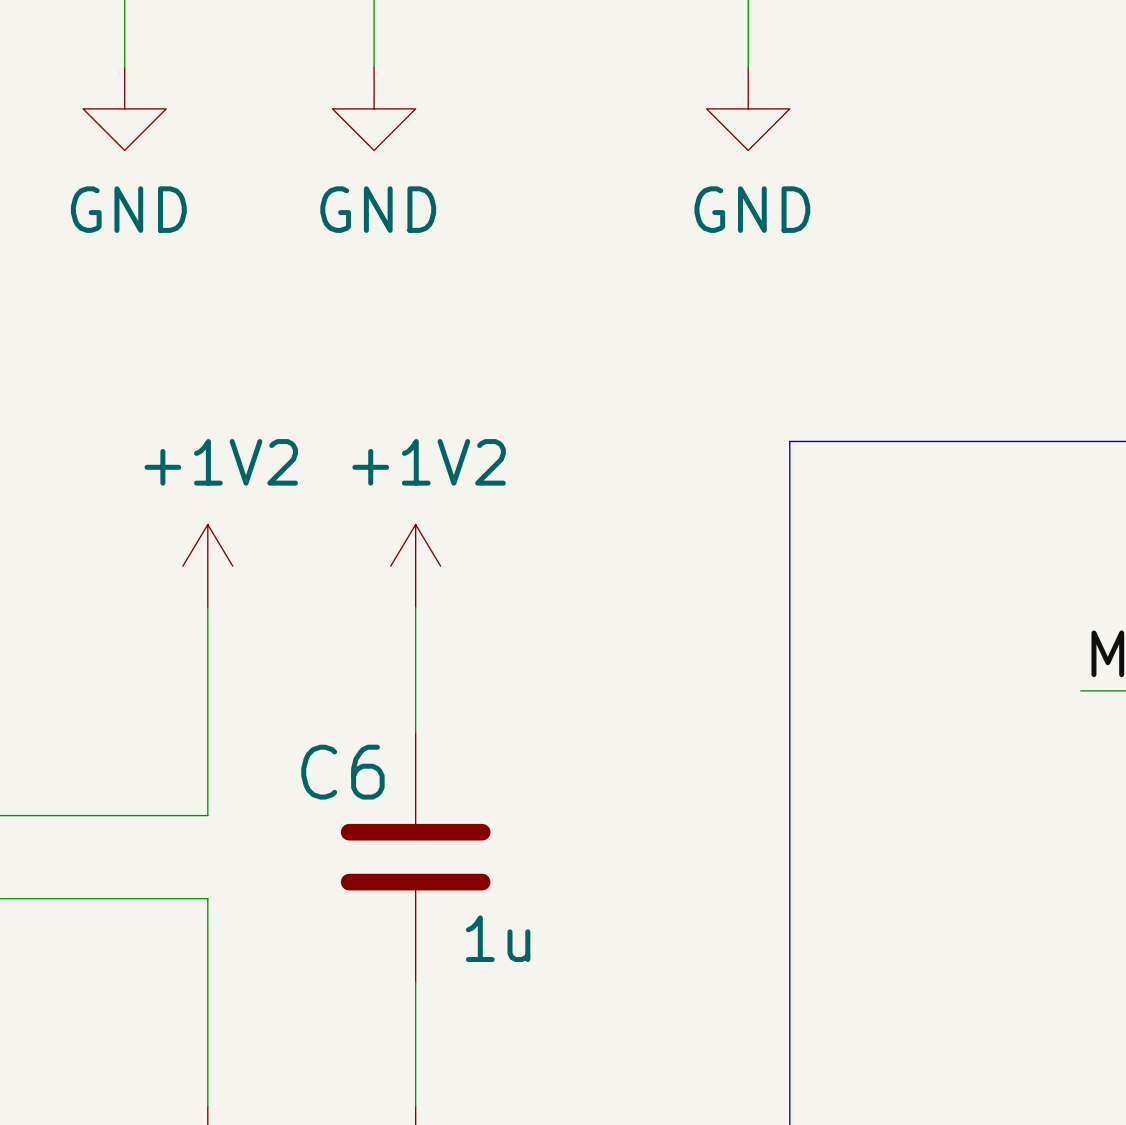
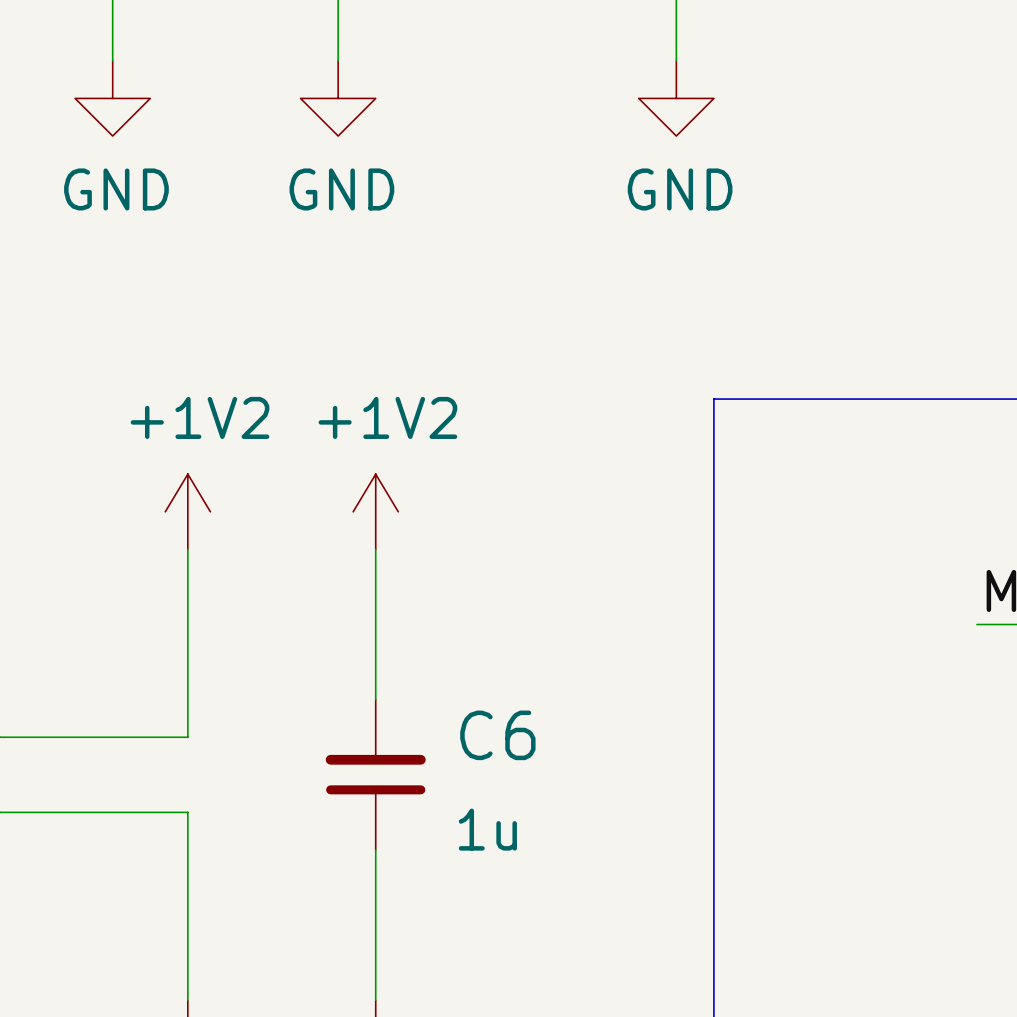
C6 symbol: [340, 732, 491, 982] -> [325, 699, 426, 850]
C6 name position: C6 (342, 772) -> C6 (497, 735)

